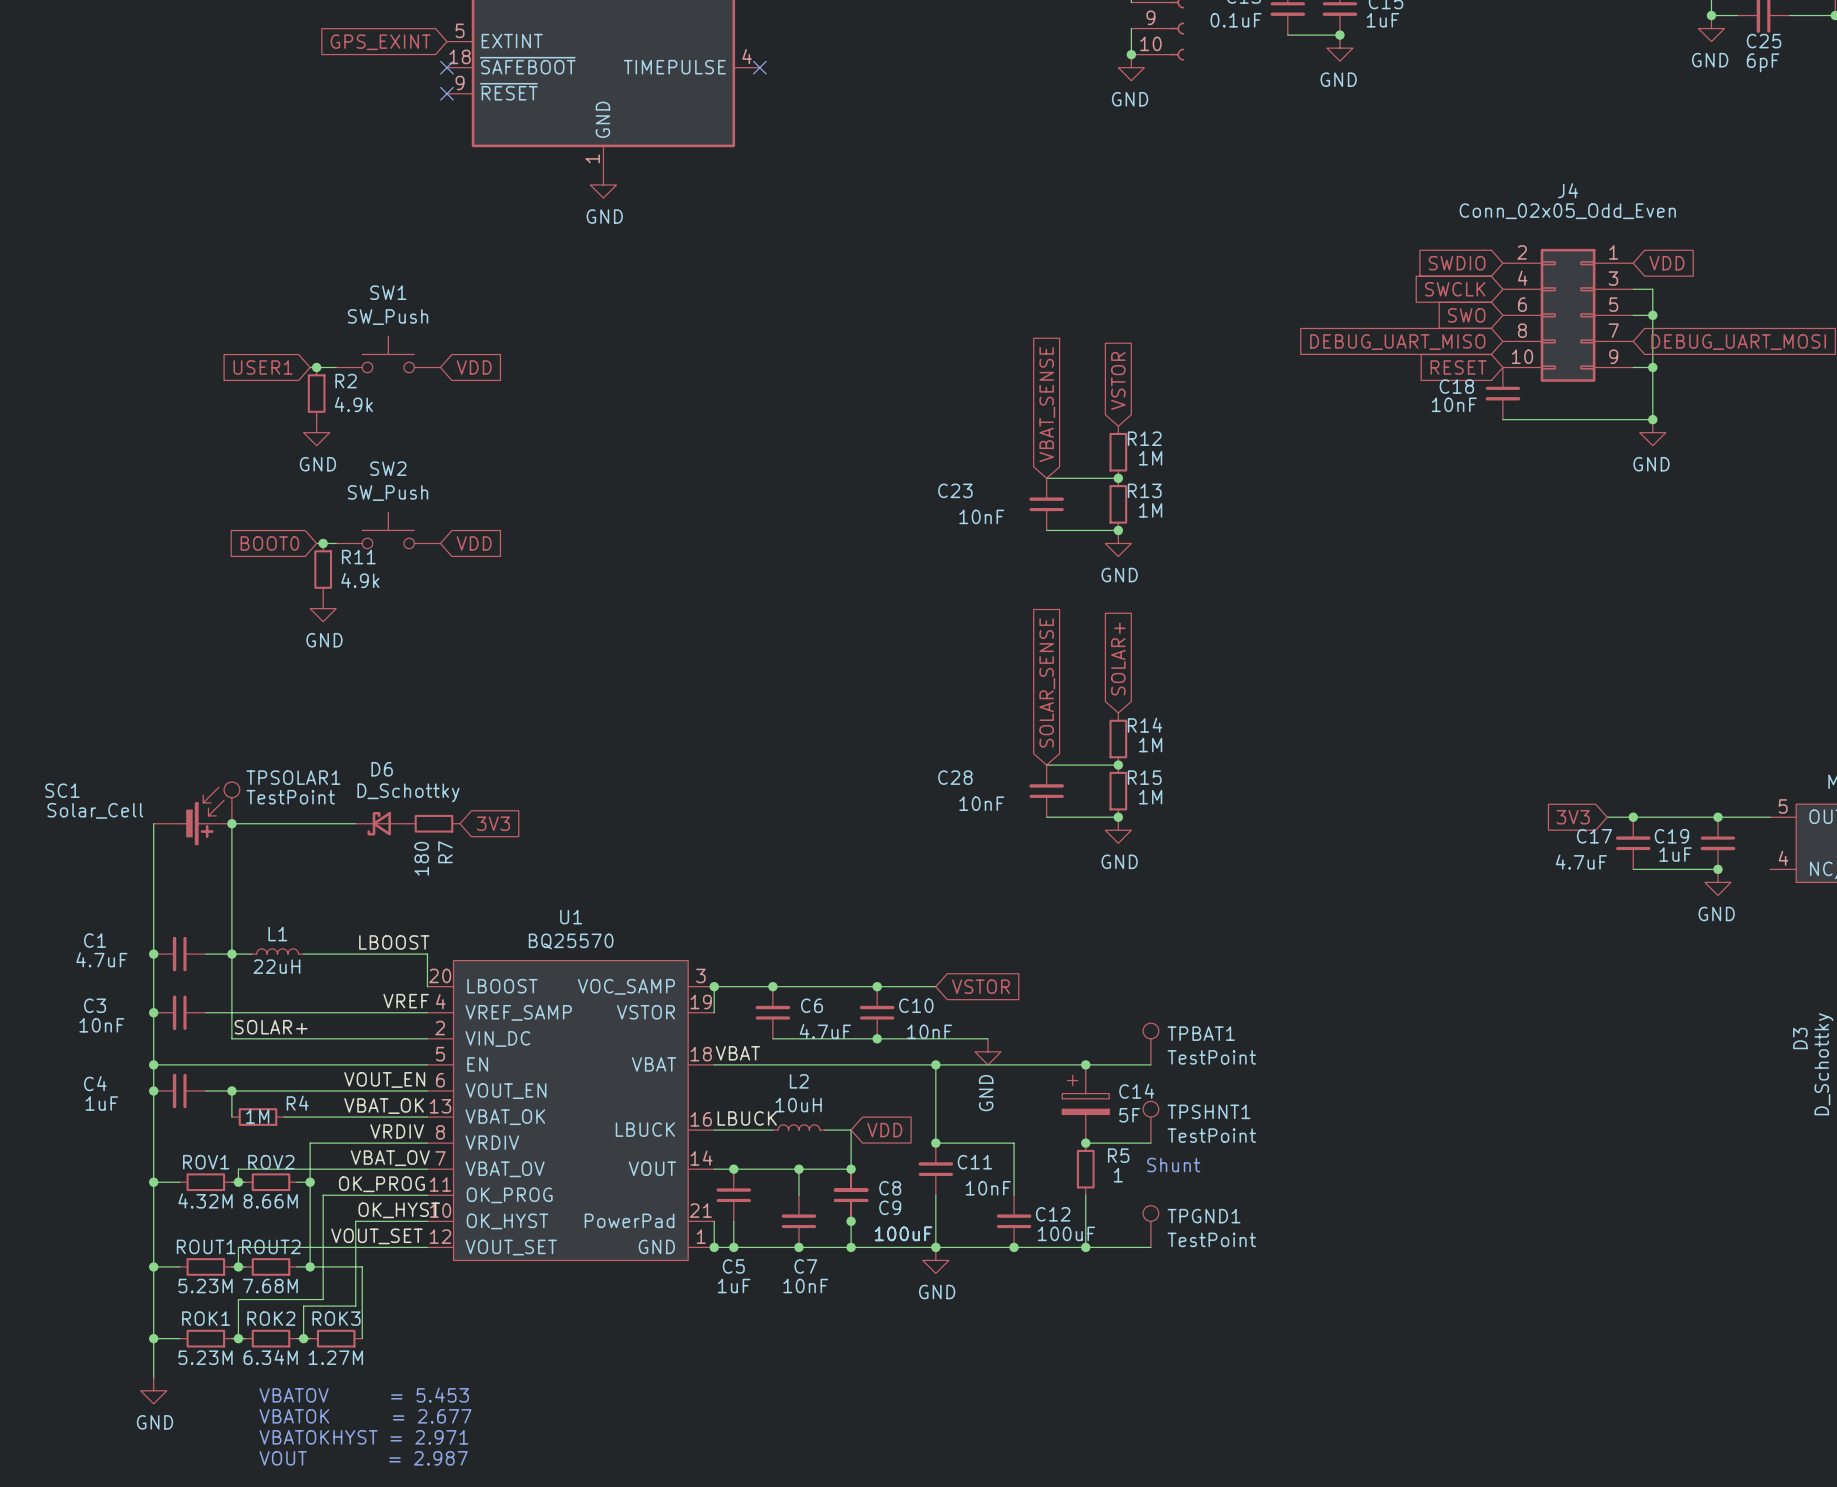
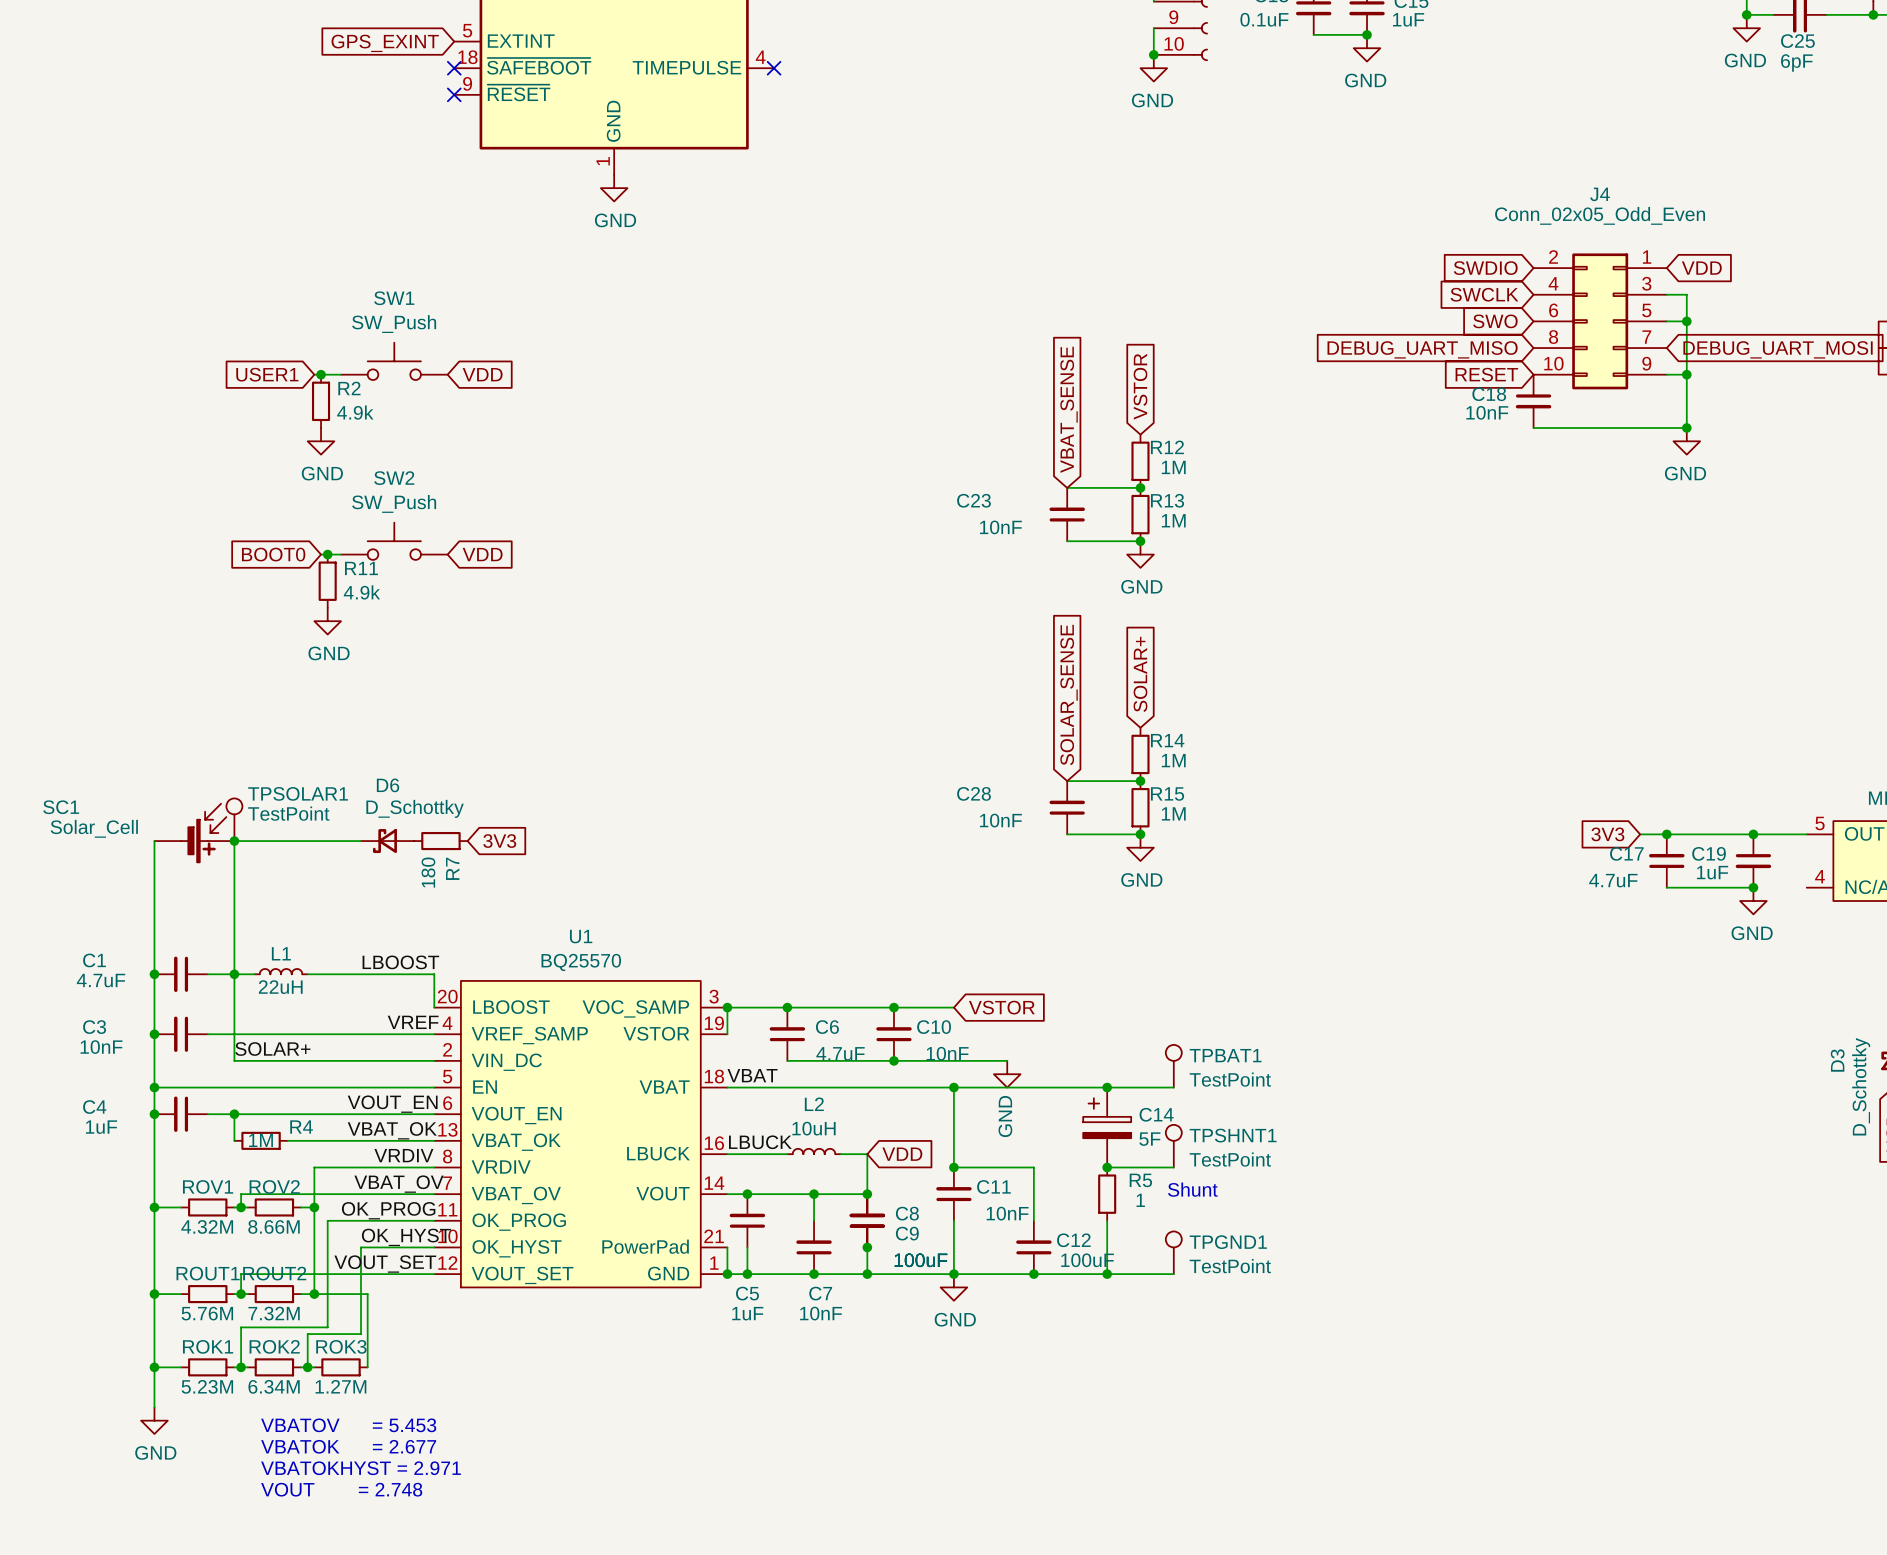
ROUT1 value: 5.23M (205, 1286) -> 5.76M (207, 1313)
ROUT2 value: 7.68M (270, 1286) -> 7.32M (274, 1313)
text: VOUT = 2.987 (363, 1458) -> VOUT = 2.748 (341, 1489)

